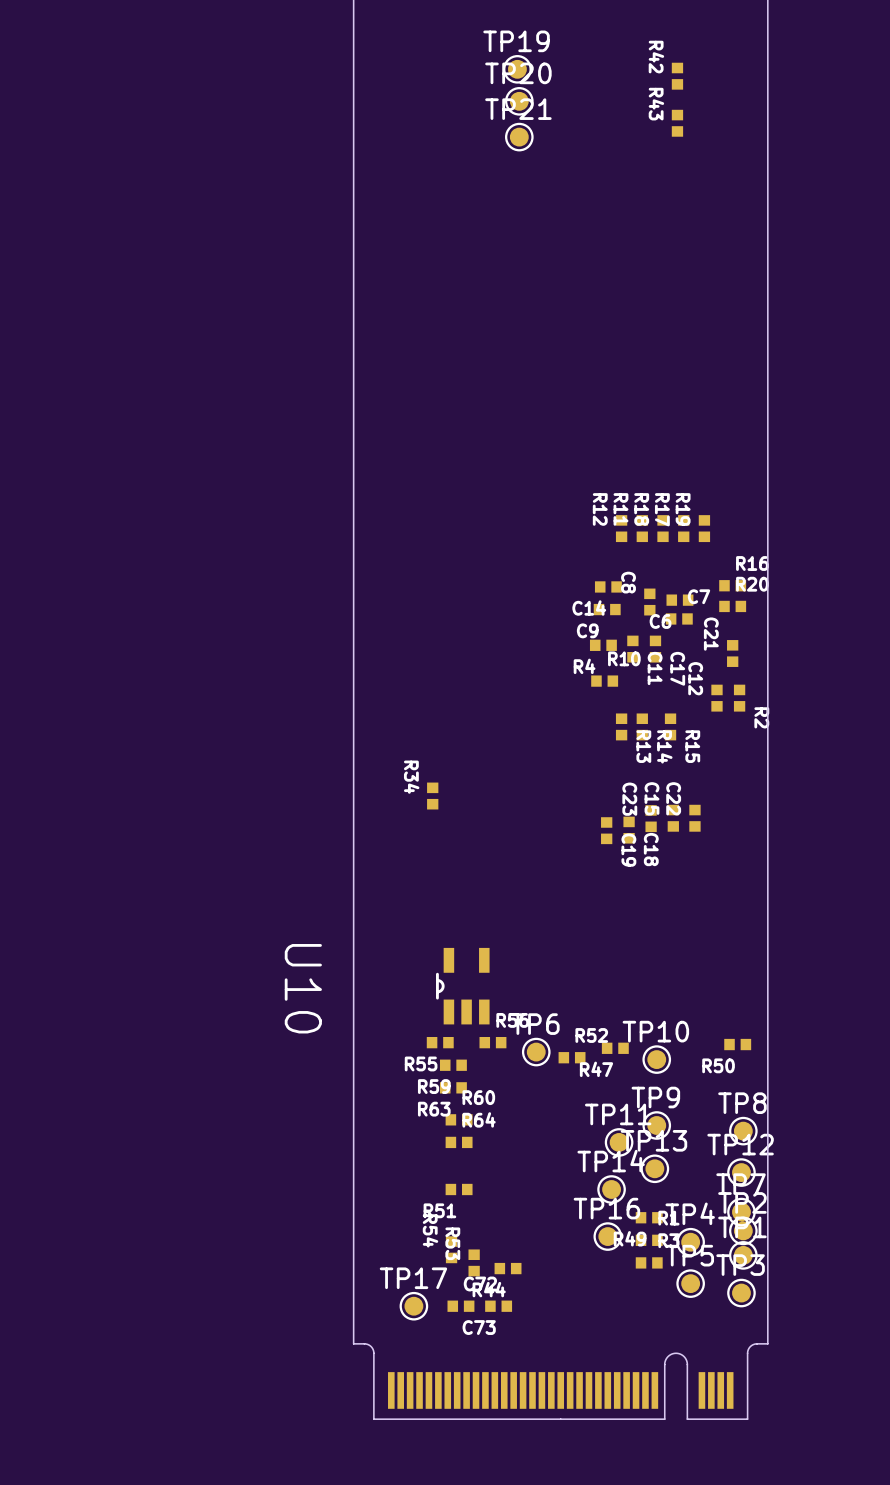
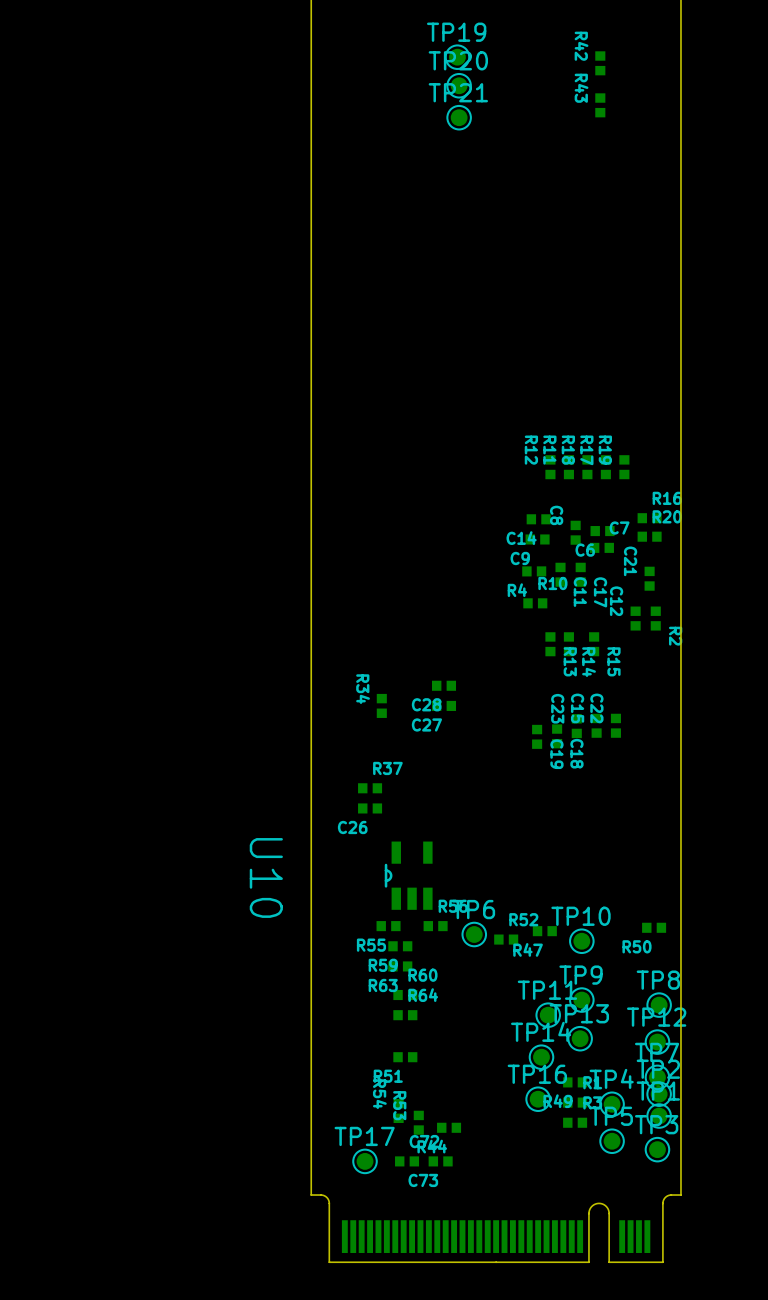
C28: none -> (444, 685)
C27: none -> (444, 705)
R37: none -> (370, 788)
C26: none -> (370, 808)

